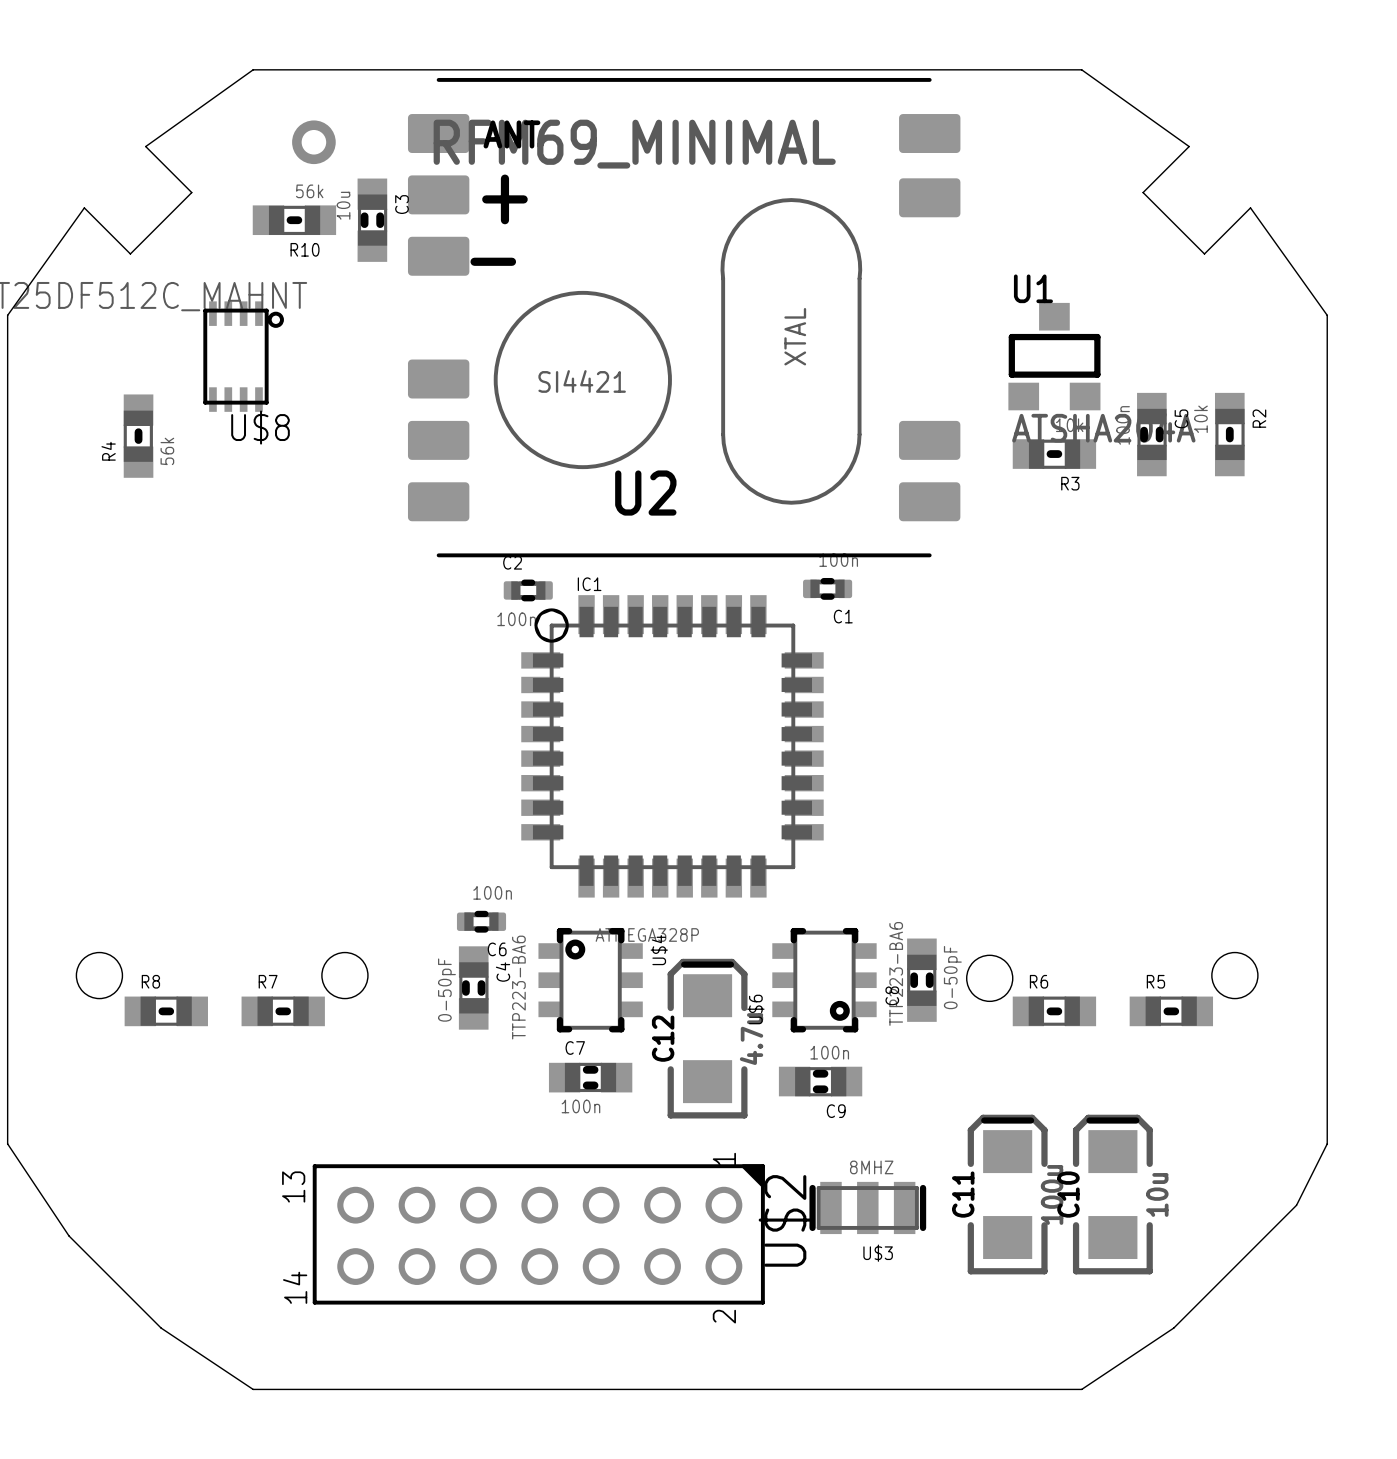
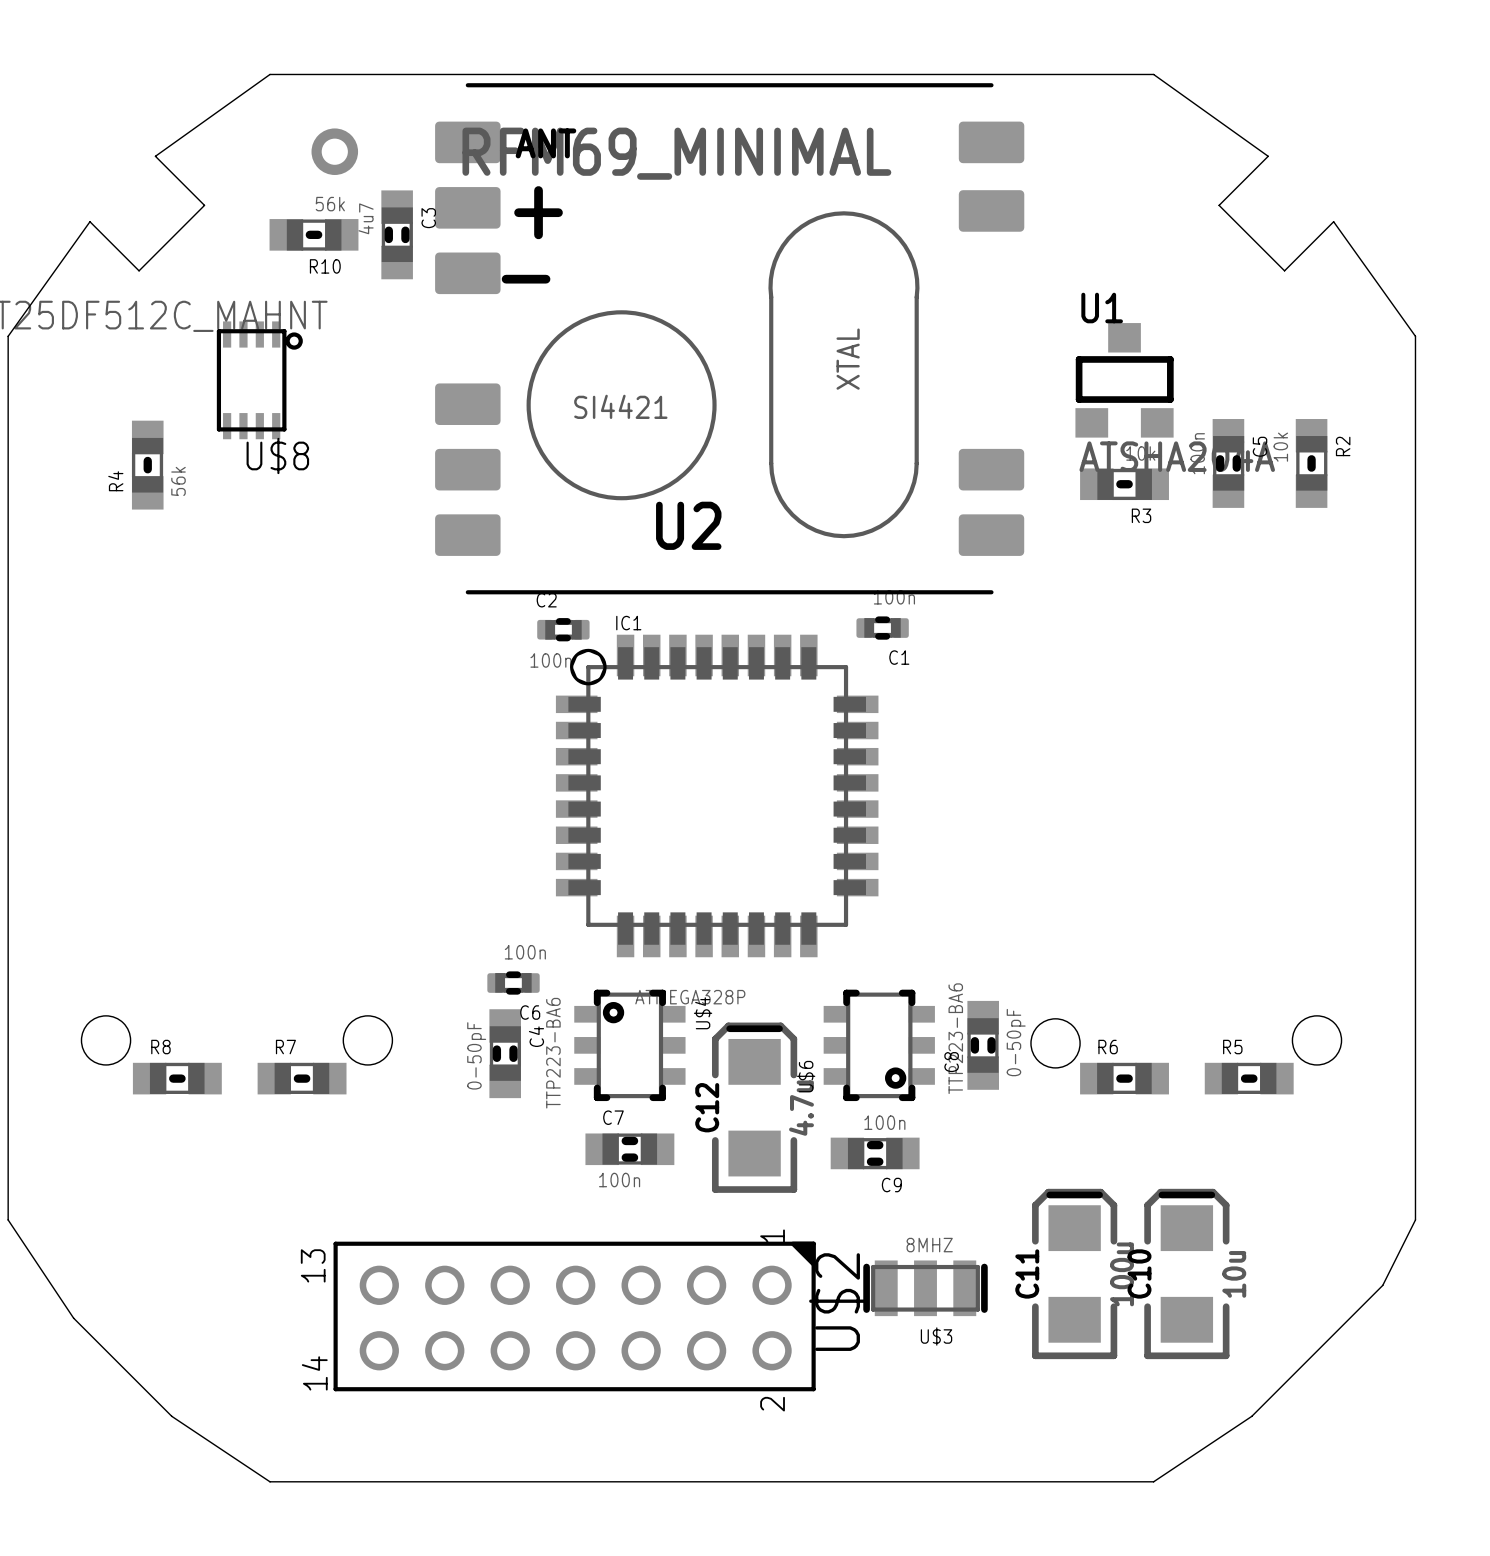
C3 value: 10u (343, 205) -> 4u7 (366, 218)

